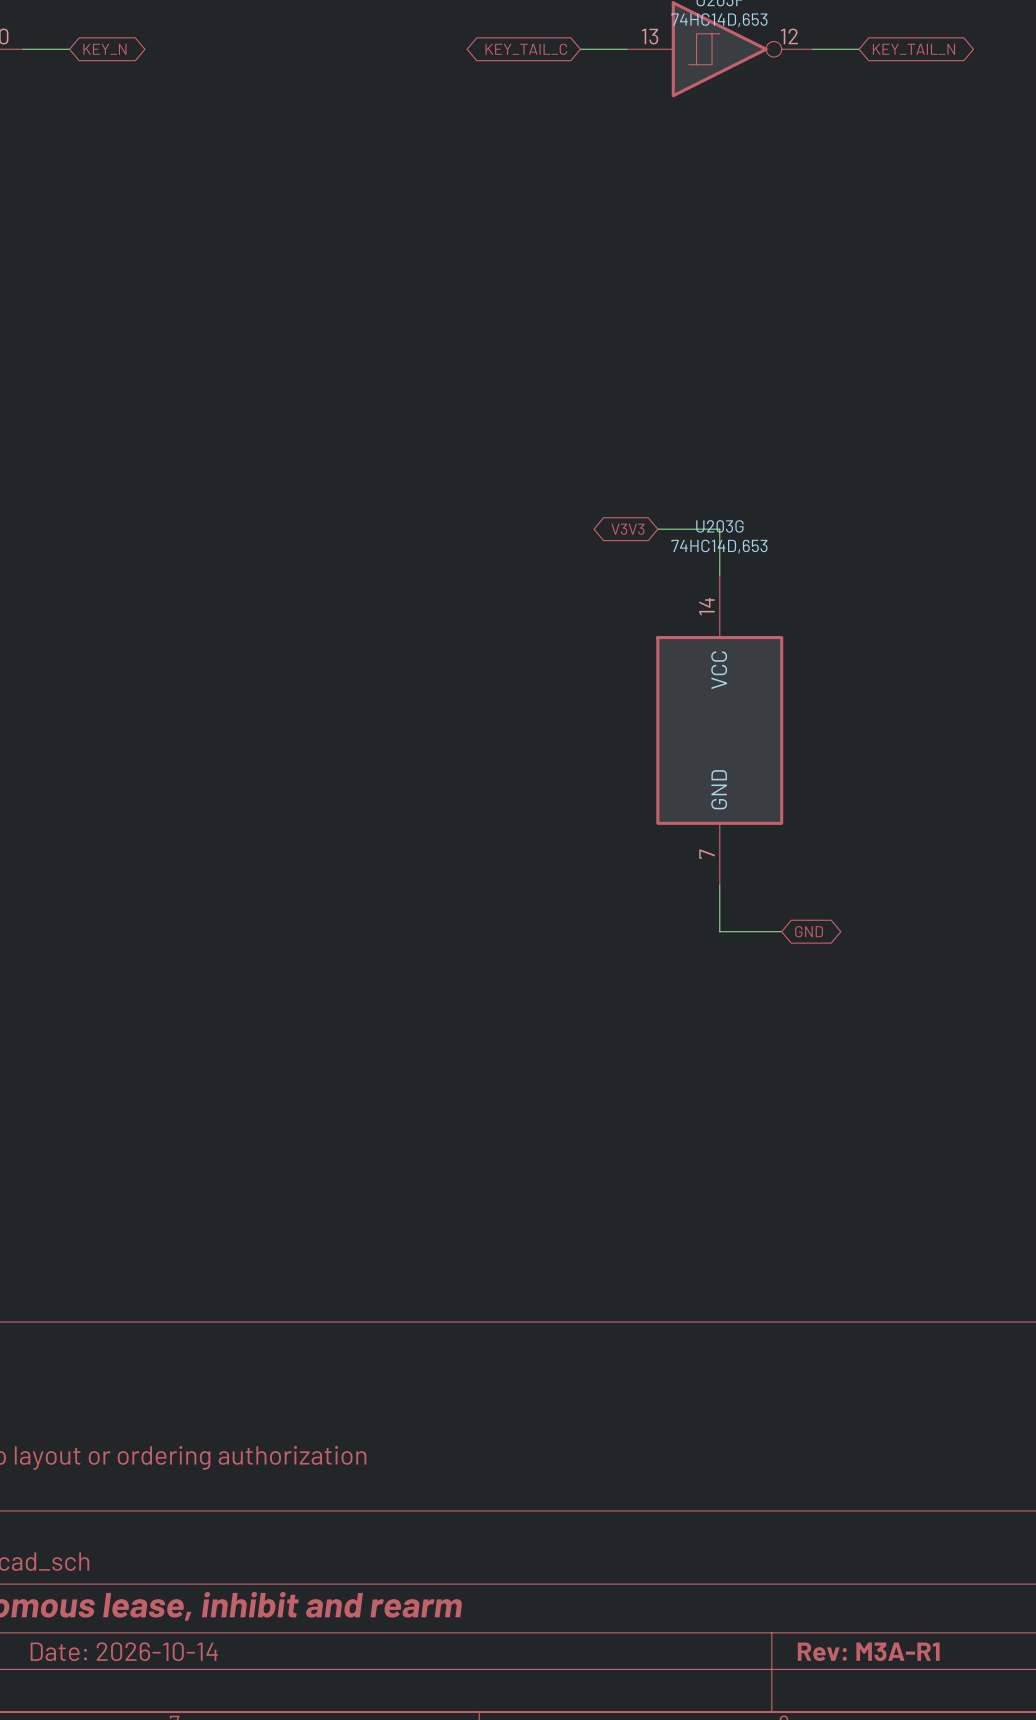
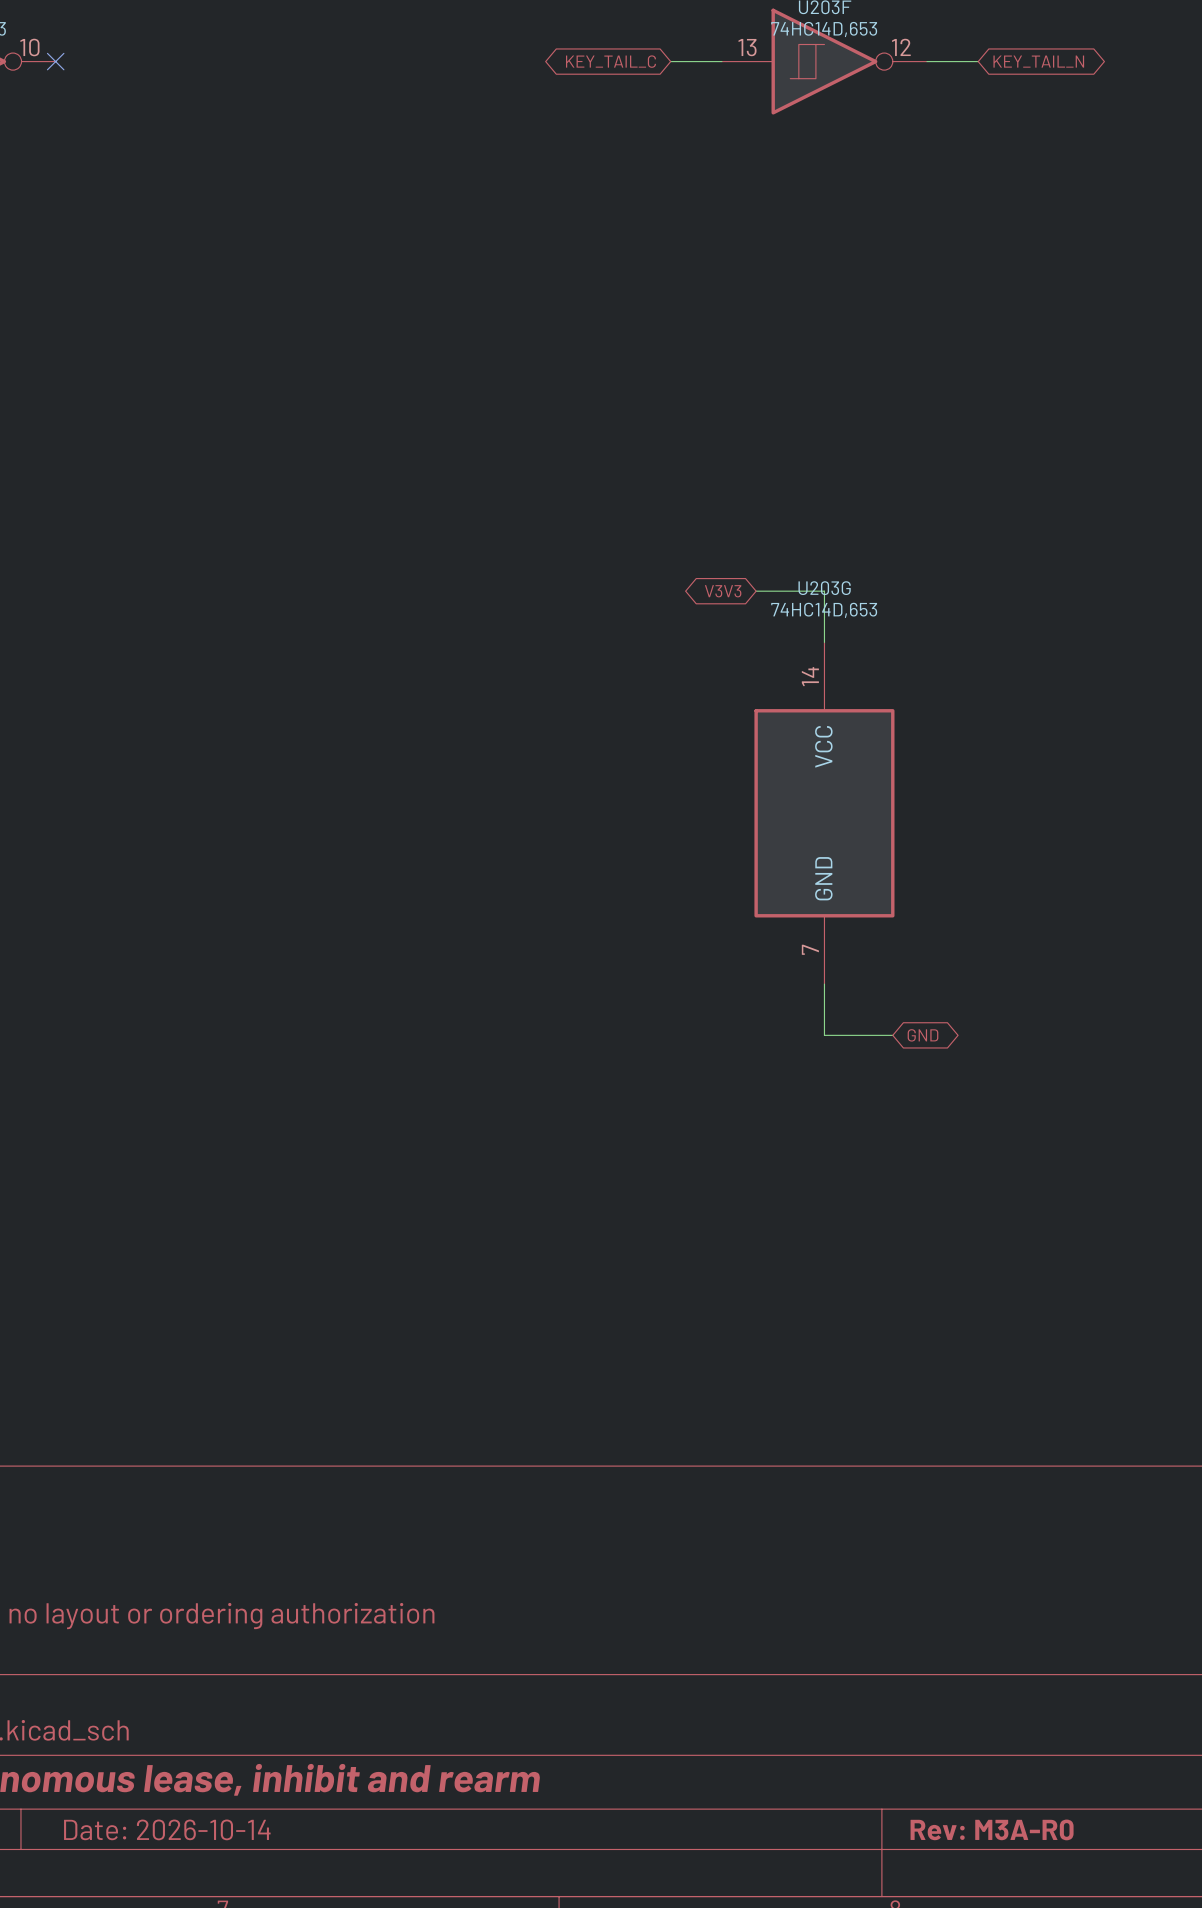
wire: (23, 49) (69, 49) -> none
no-connect mark: none -> (55, 61)
global label: KEY_N (104, 49) -> none
title block: Rev: M3A-R1 (868, 1651) -> Rev: M3A-R0 (992, 1829)

